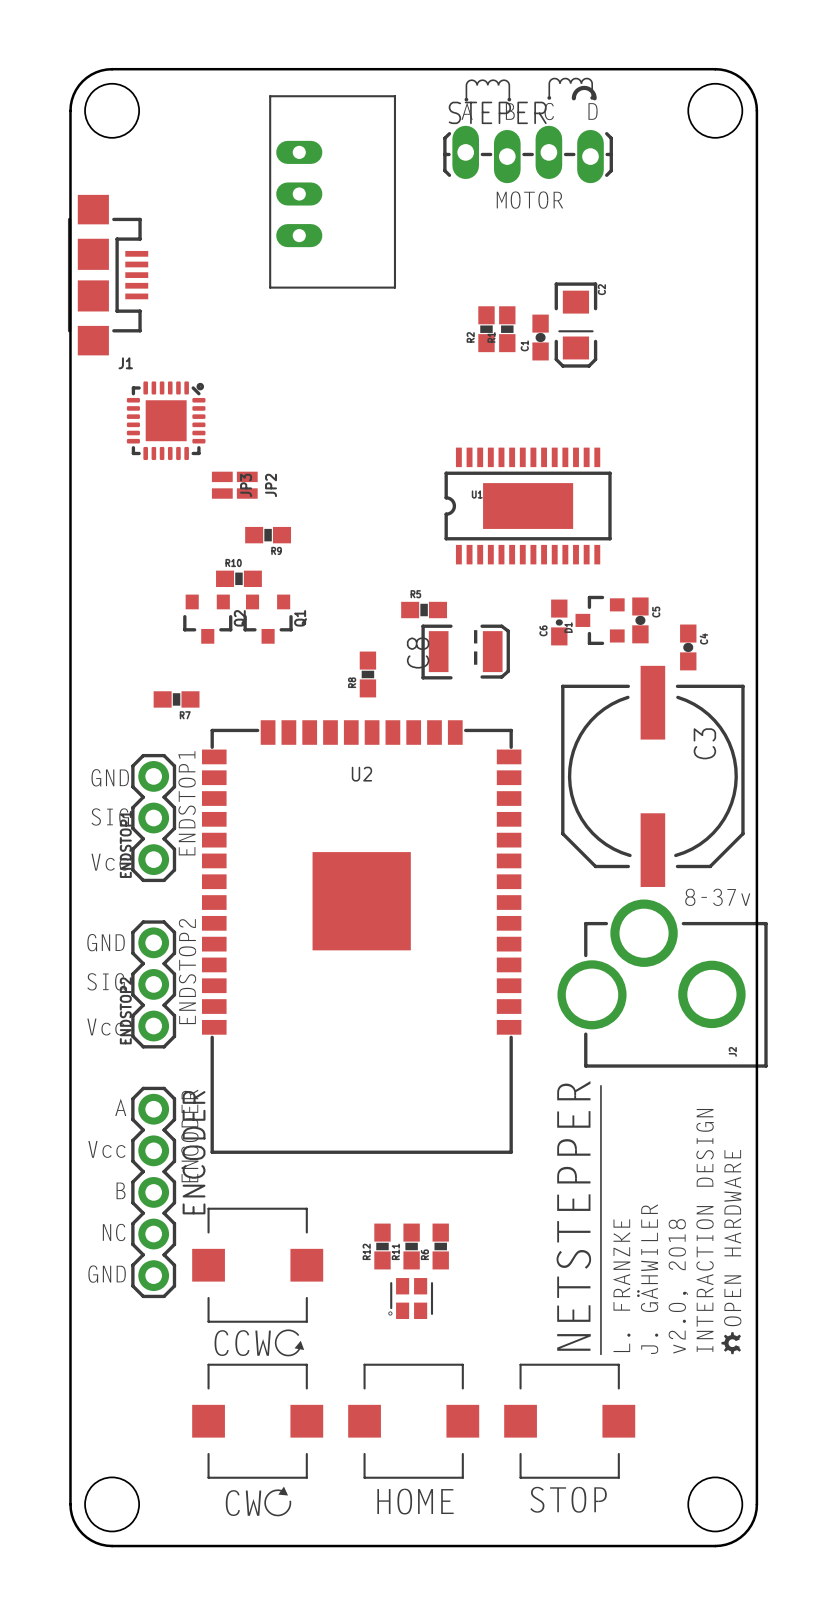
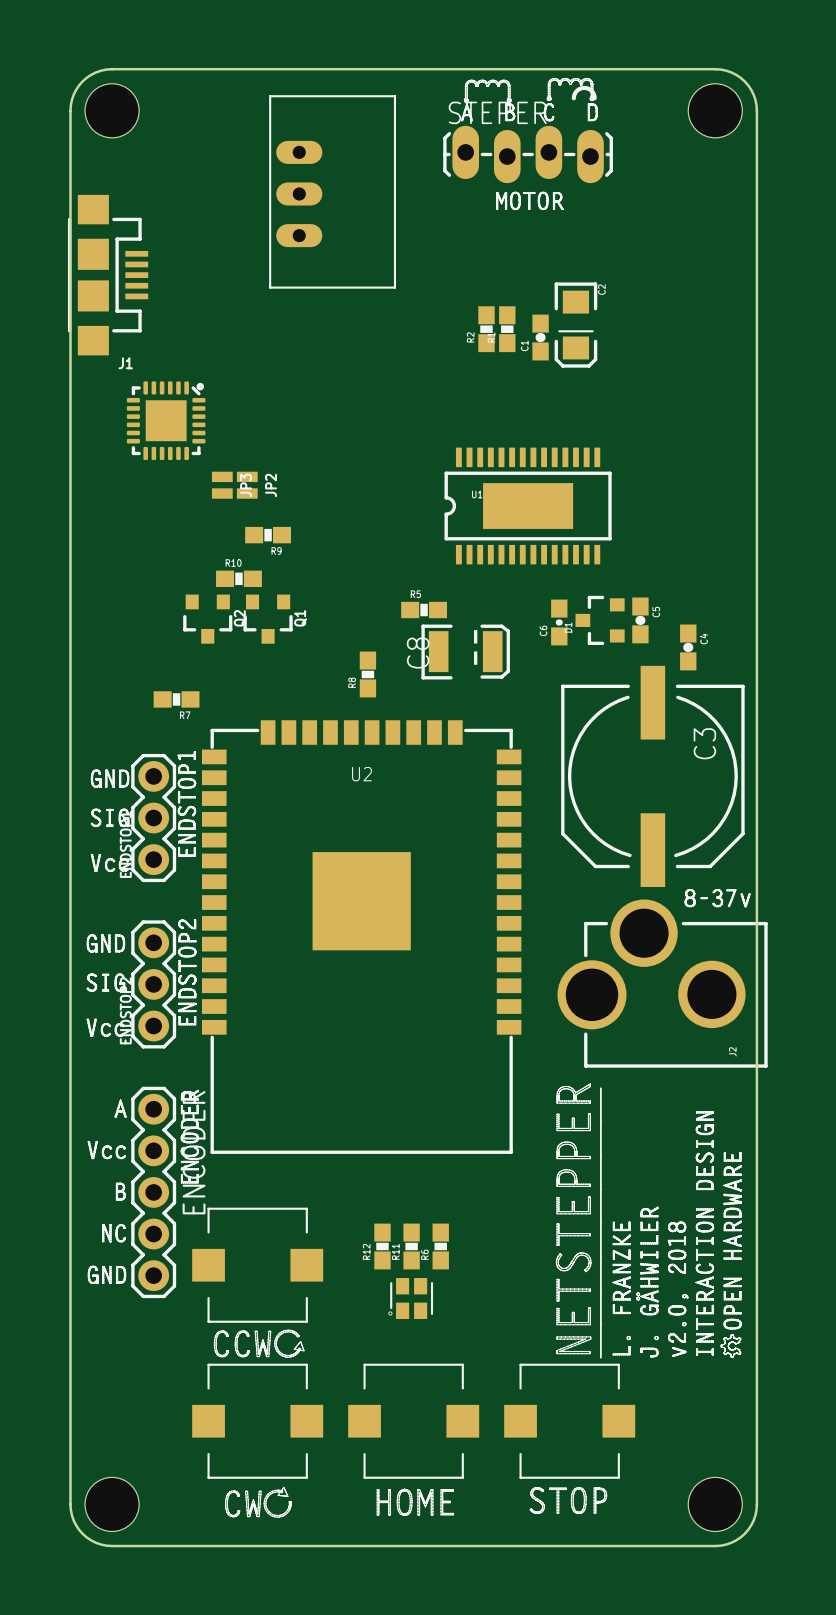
drawing shape: [87, 77, 751, 1517] -> [86, 78, 751, 1518]

